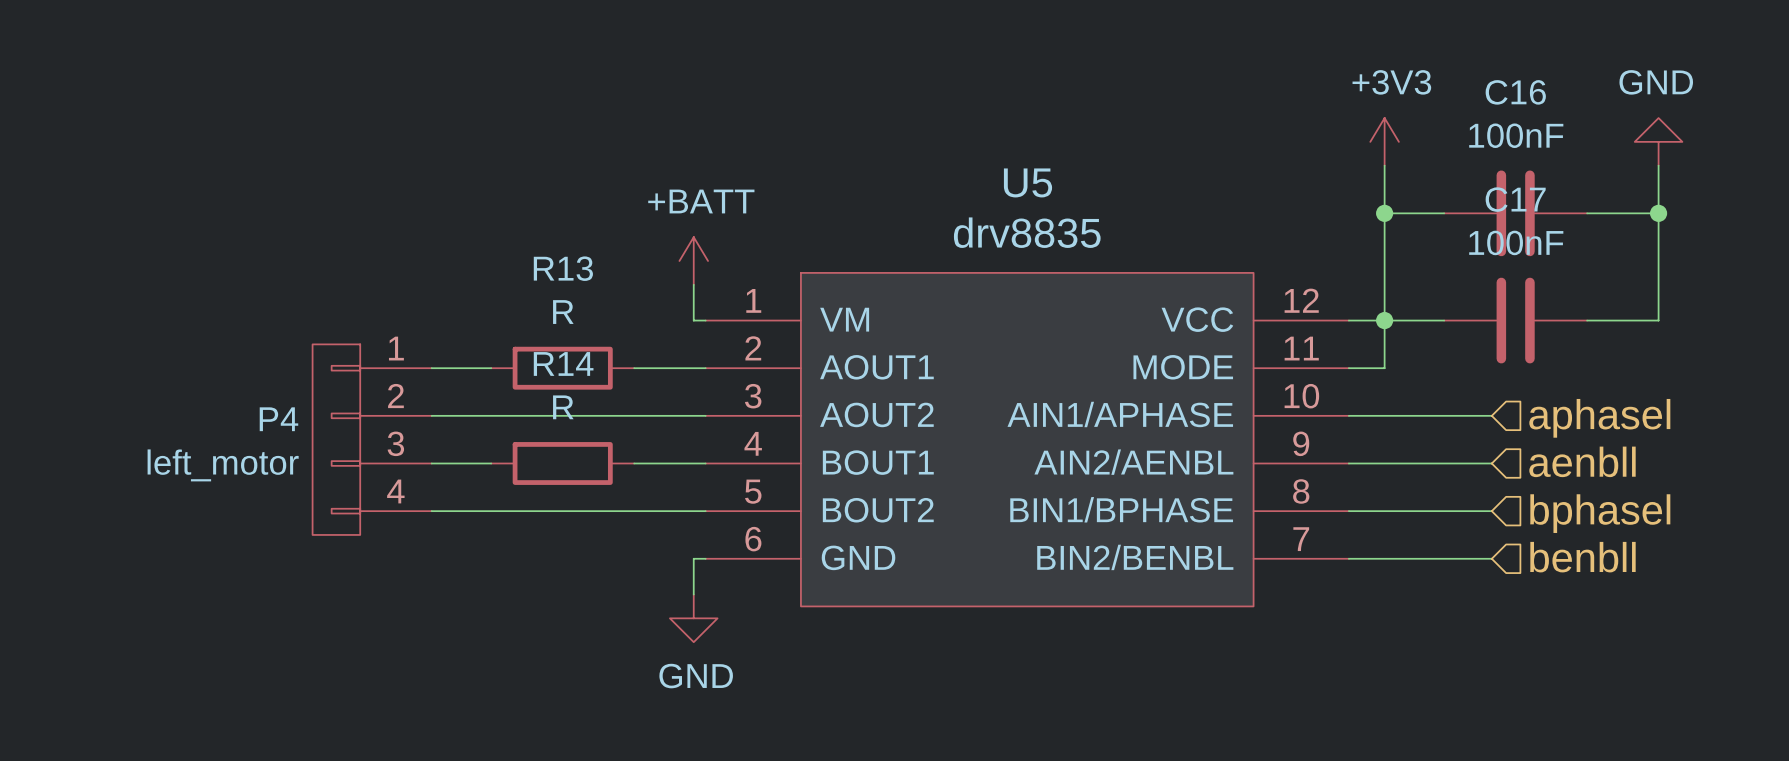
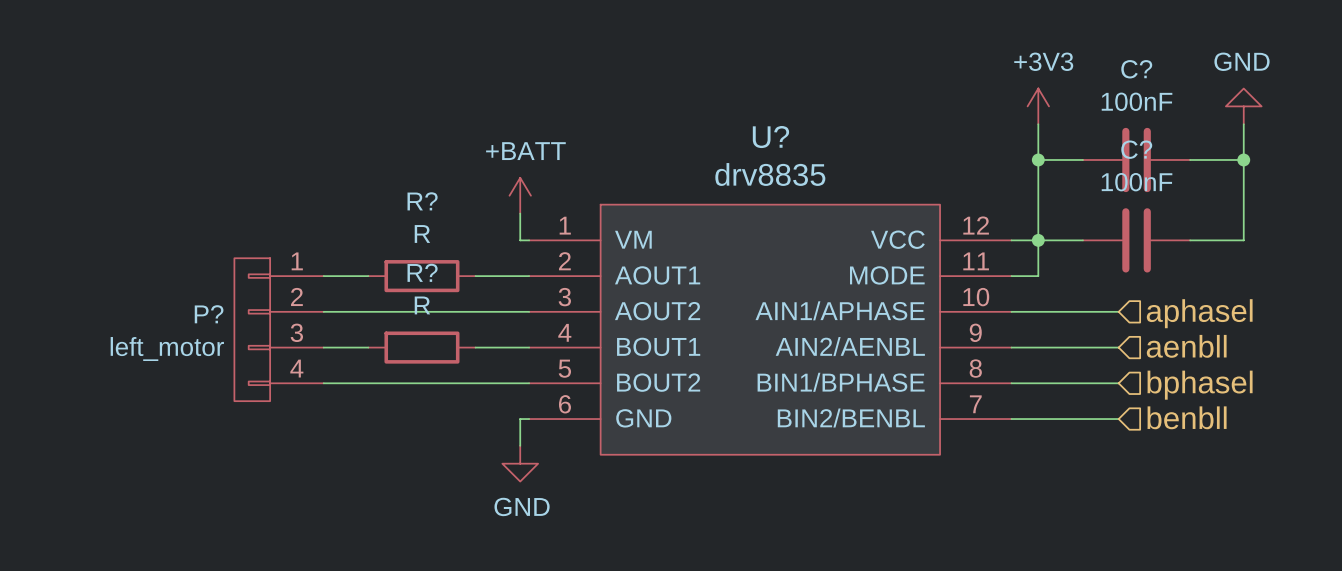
C16 name: C16 (1515, 92) -> C? (1136, 69)
U5 name: U5 (1028, 182) -> U? (770, 137)
C17 name: C17 (1515, 199) -> C? (1136, 149)
R13 name: R13 (563, 268) -> R? (422, 201)
R14 name: R14 (563, 363) -> R? (422, 272)
P4 name: P4 (278, 419) -> P? (209, 314)

